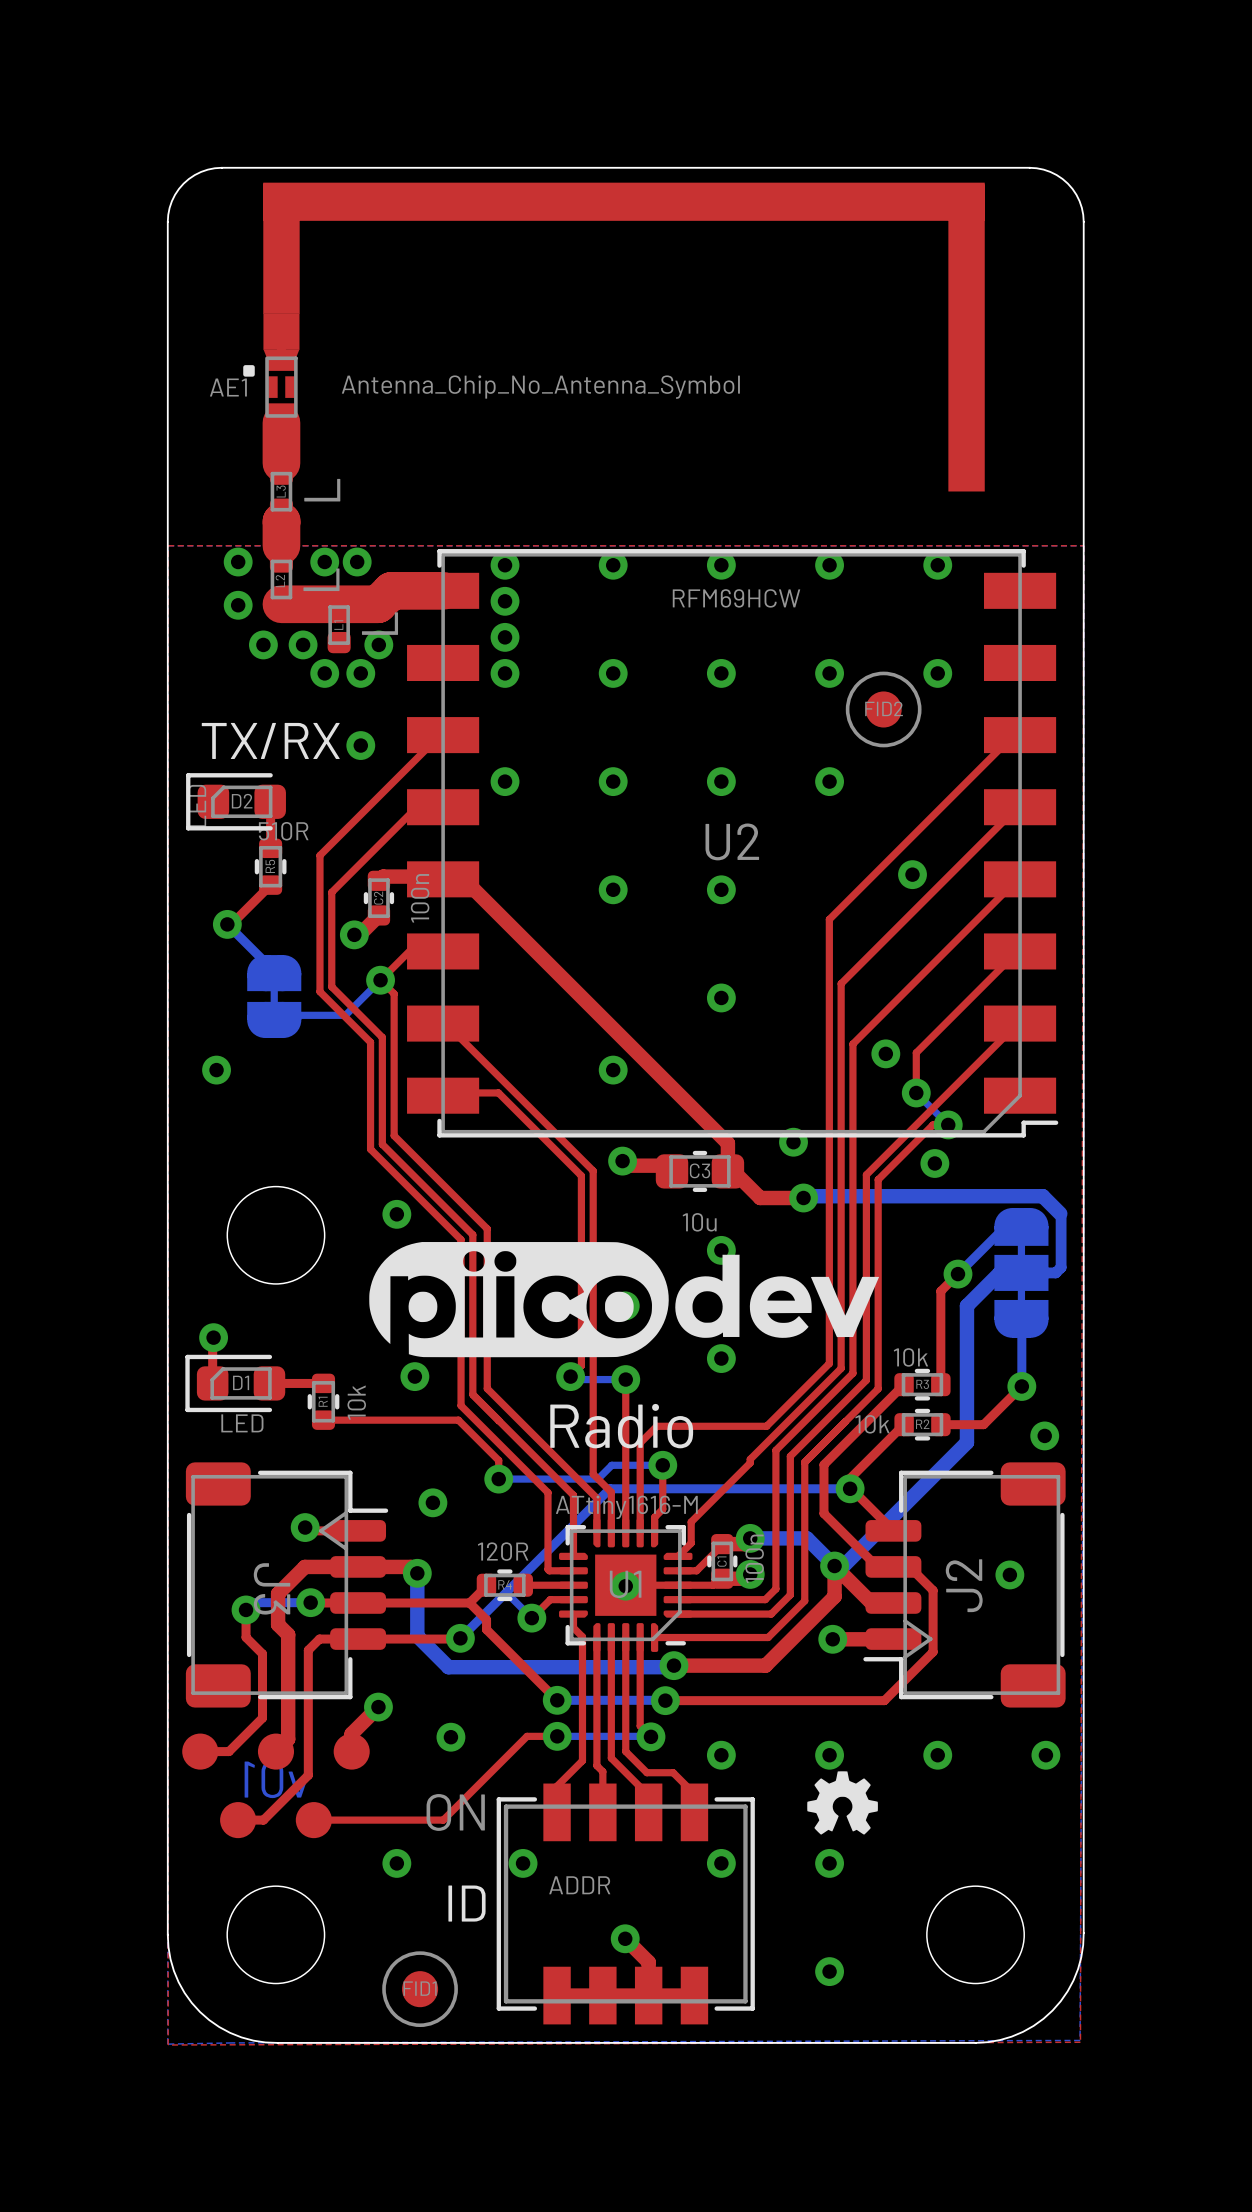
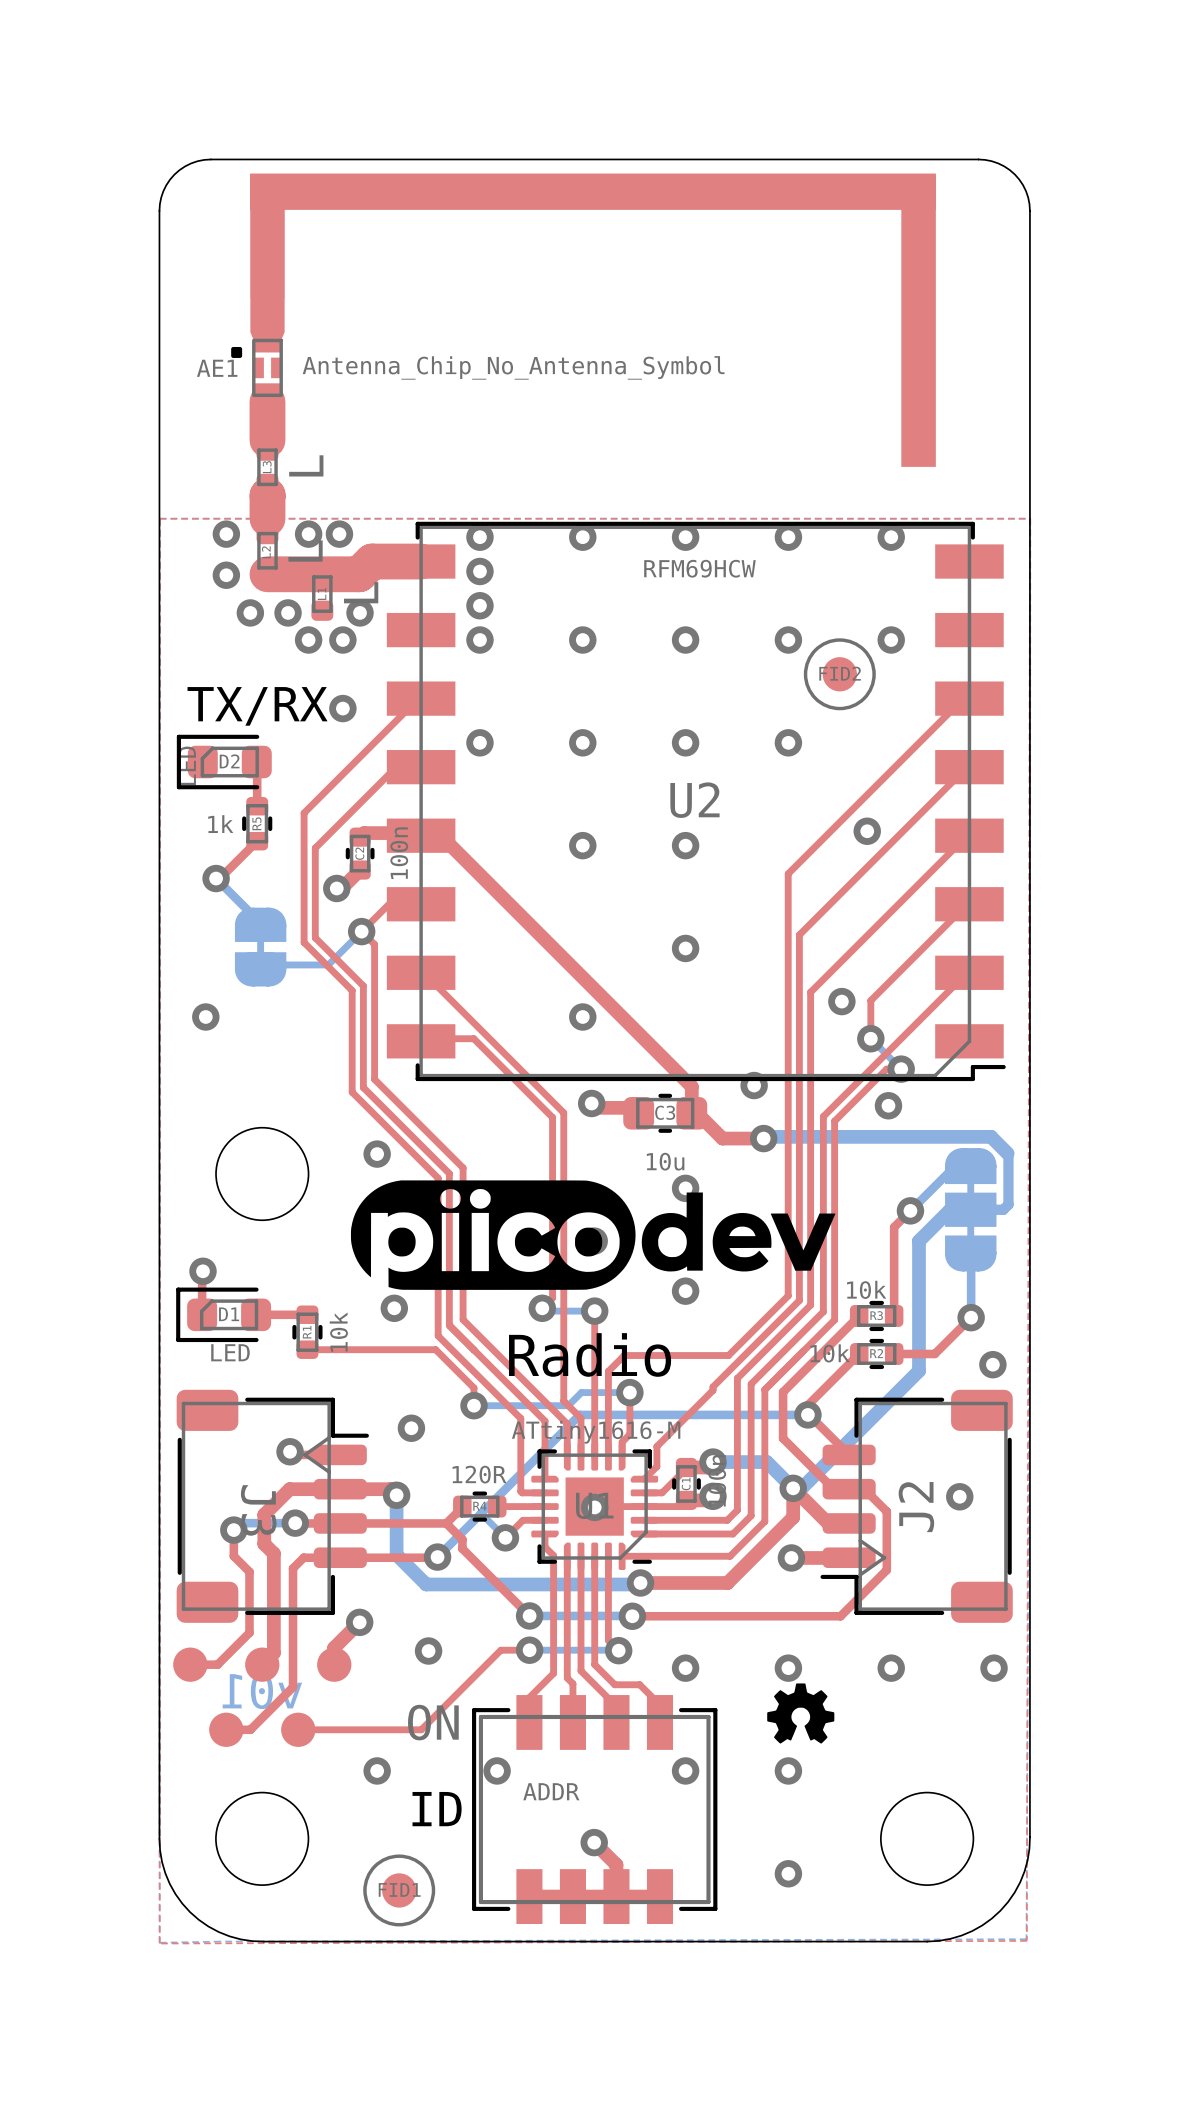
R5 value: 510R (283, 831) -> 1k (220, 824)

